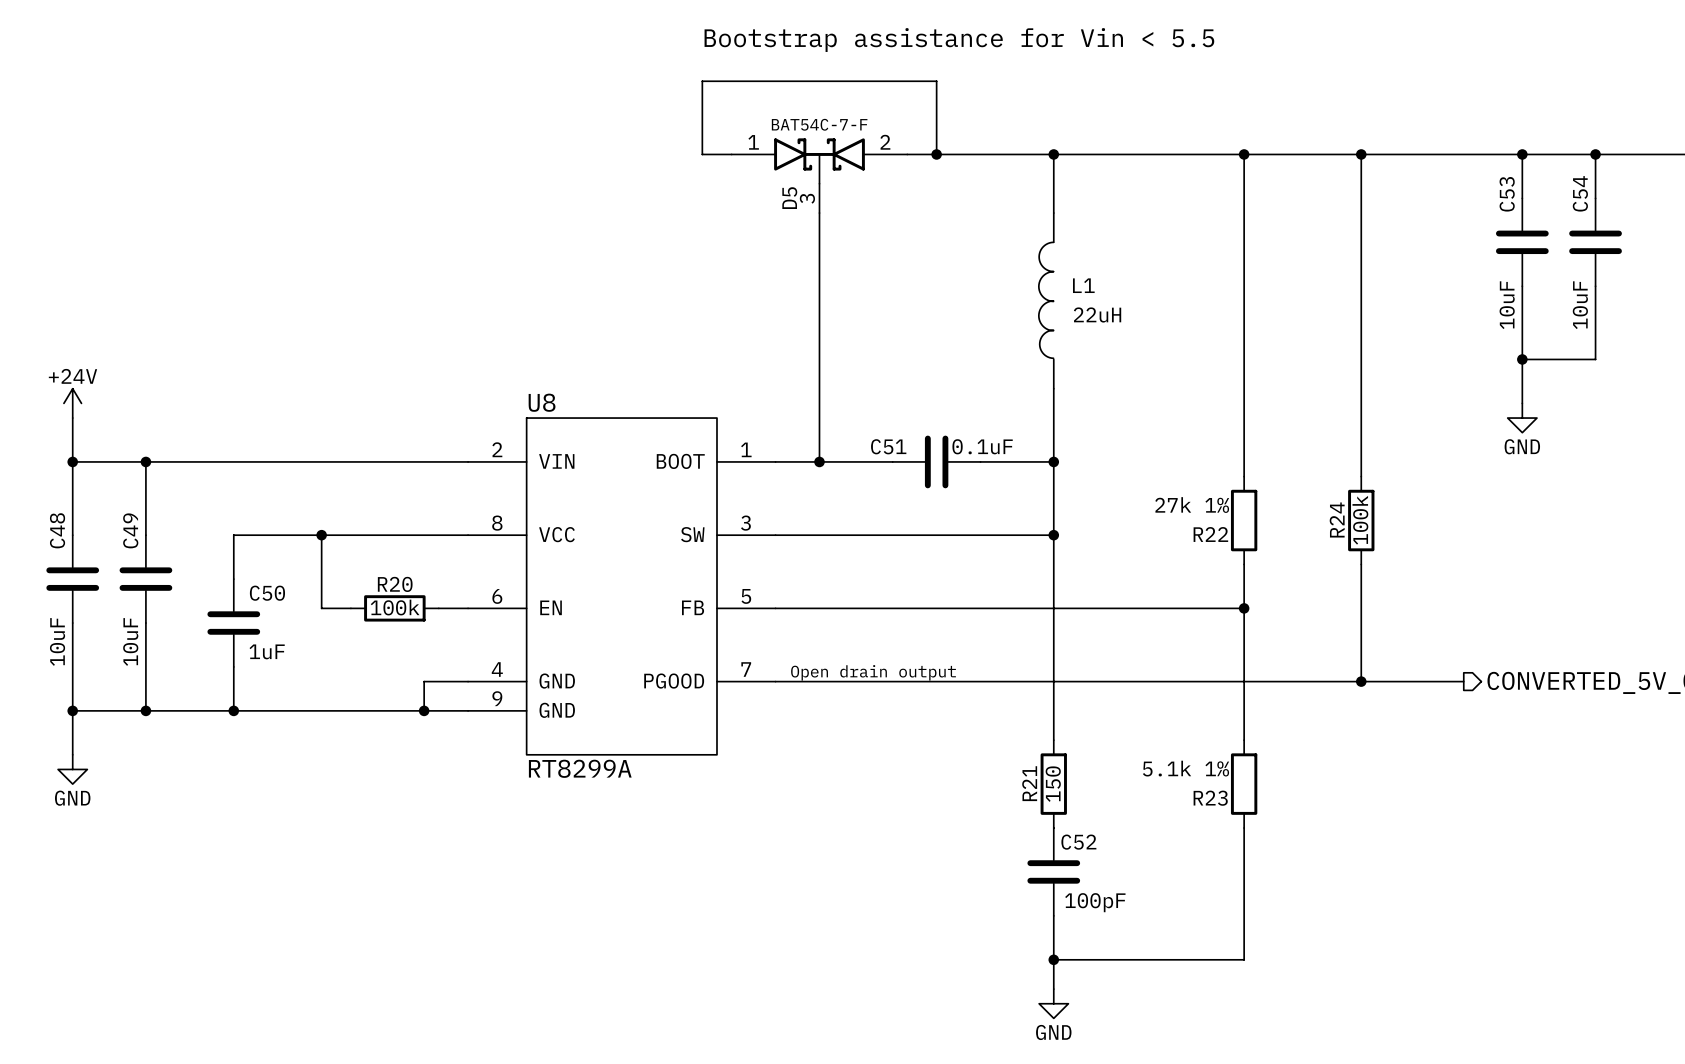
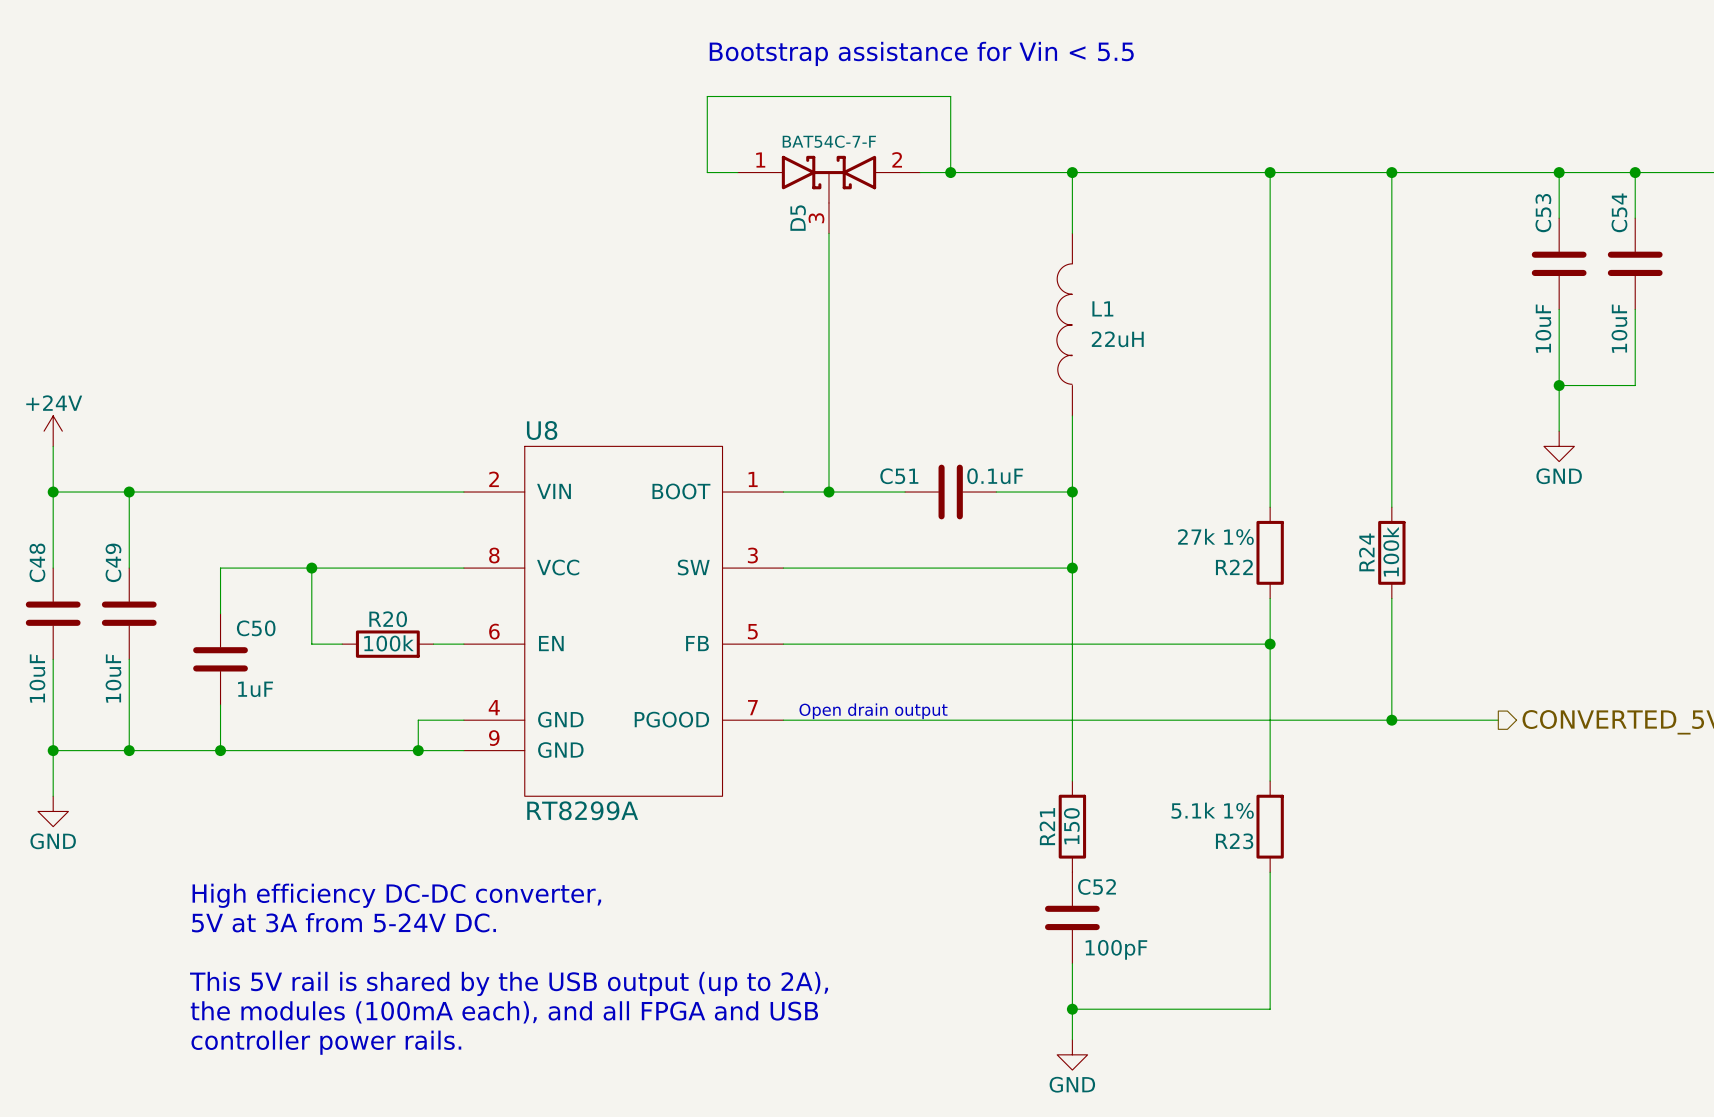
text: none -> High efficiency DC-DC converter, (396, 895)
text: none -> 5V at 3A from 5-24V DC. (344, 922)
text: none -> This 5V rail is shared by the USB output (up to 2A), (509, 983)
text: none -> the modules (100mA each), and all FPGA and USB (504, 1012)
text: none -> controller power rails. (326, 1042)

